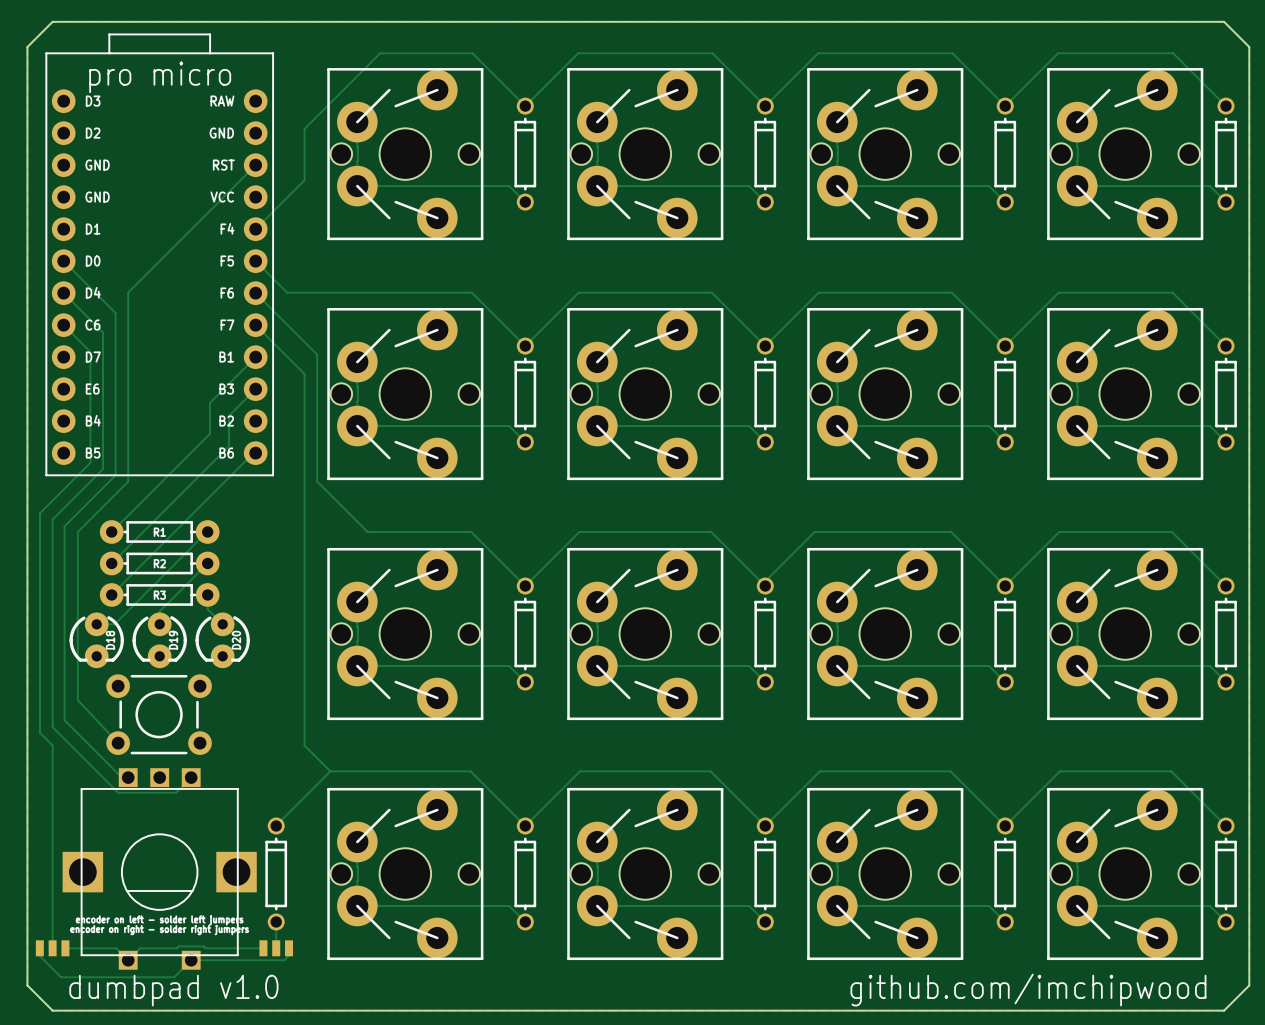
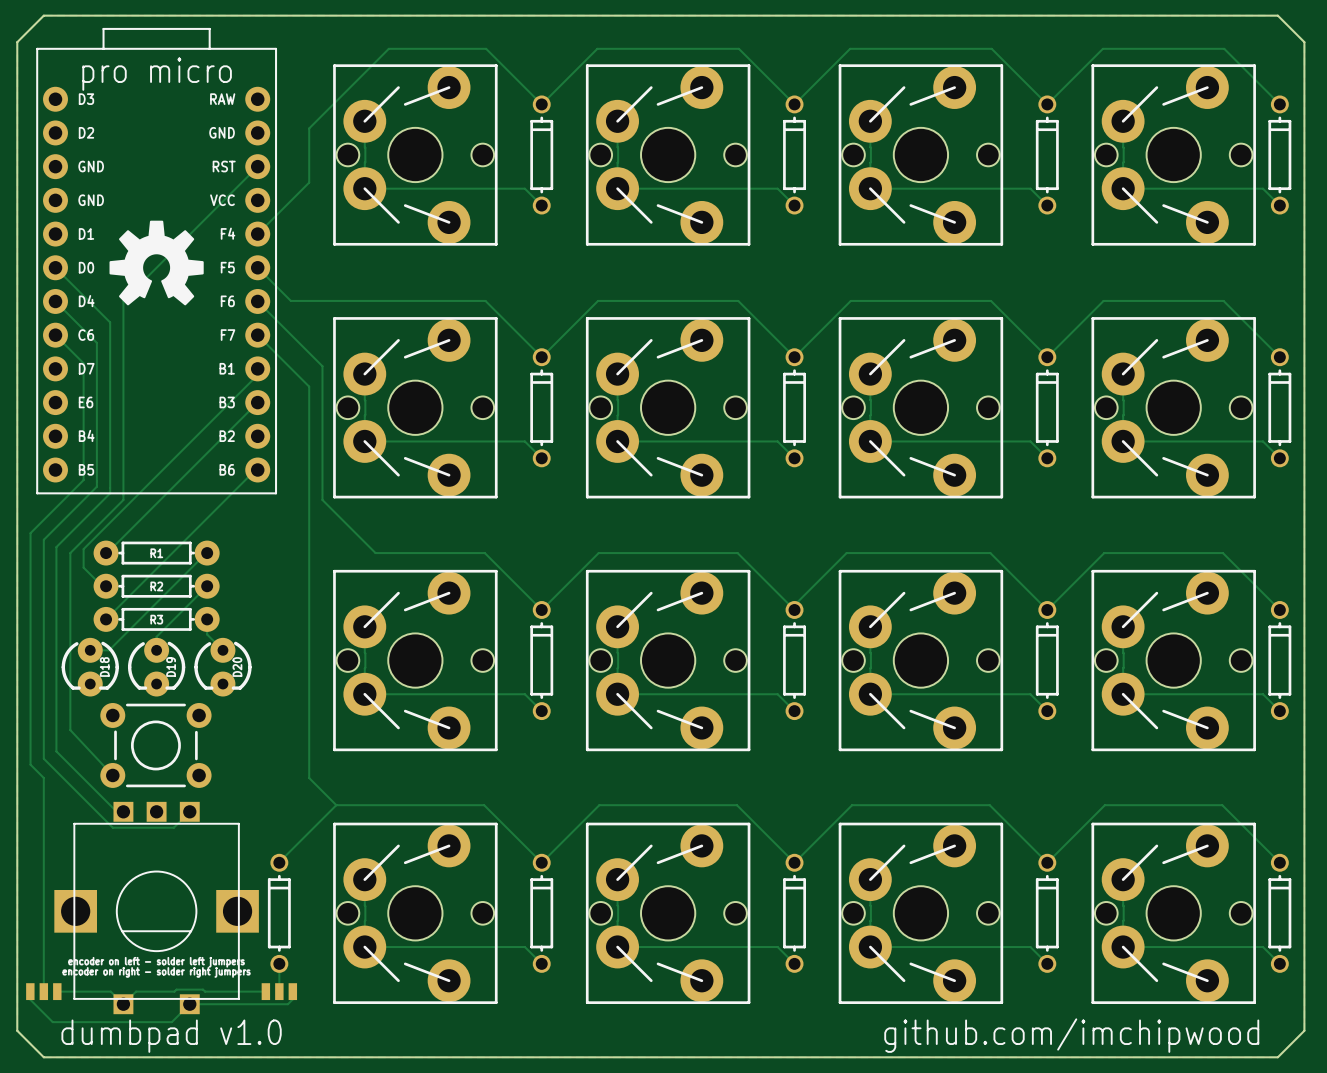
drawing: none -> [109, 220, 204, 306]
track: (255, 357) (210, 402) (210, 433) (111, 531) -> (257, 368) (257, 374) (83, 549) (83, 567) (102, 586) (106, 586)
track: (228, 415) (228, 446) (111, 563) -> (229, 430) (106, 553)

